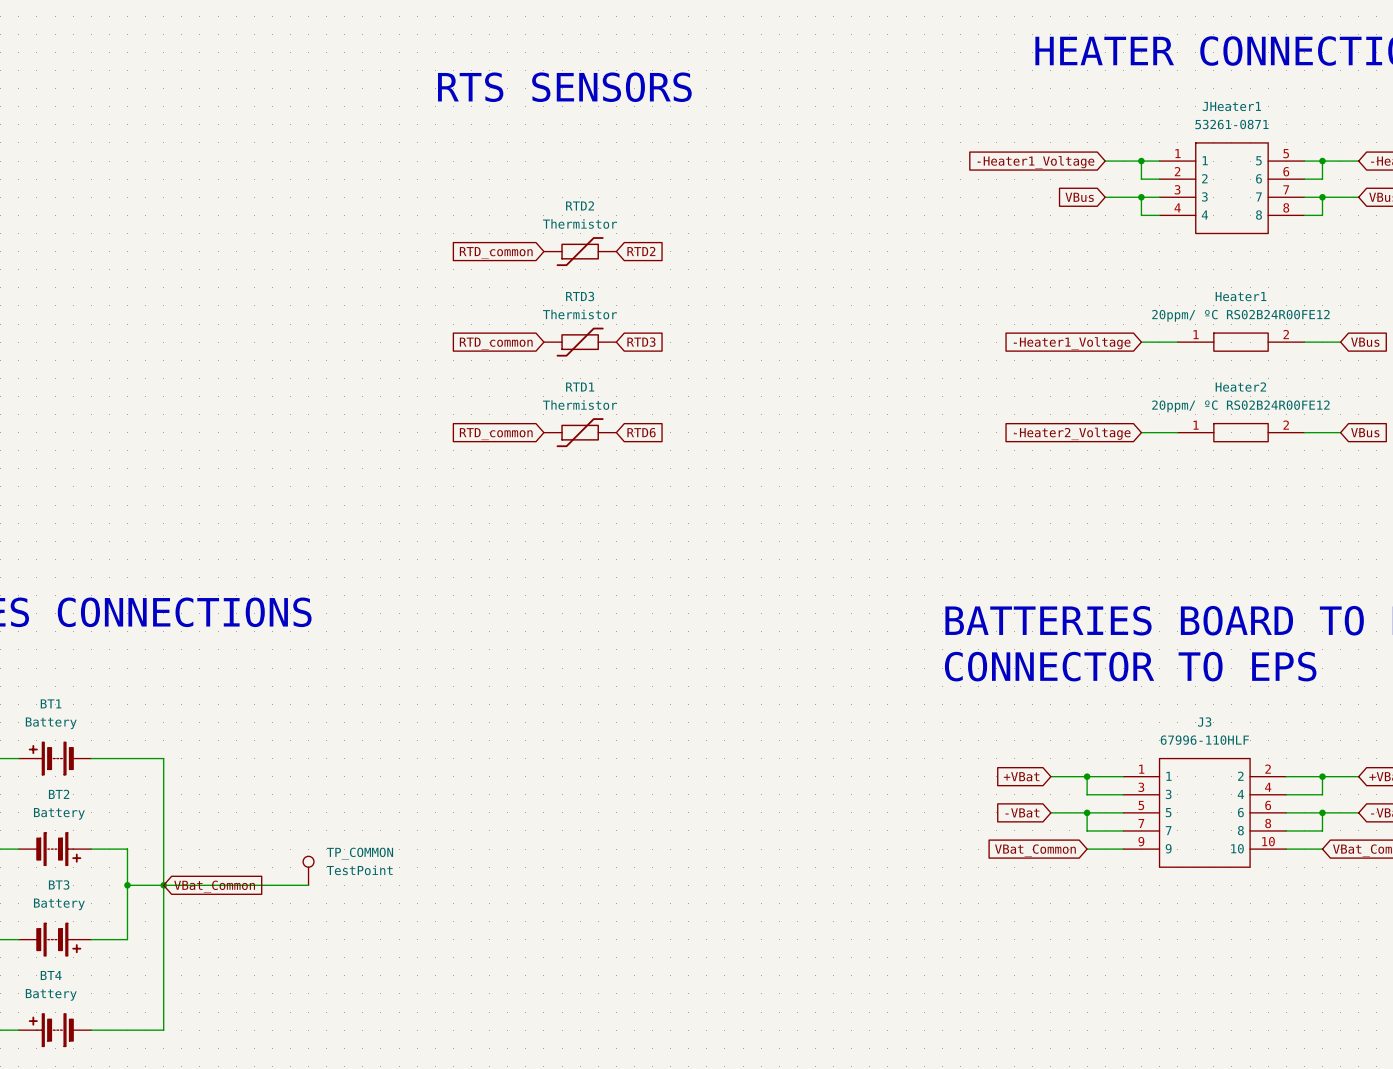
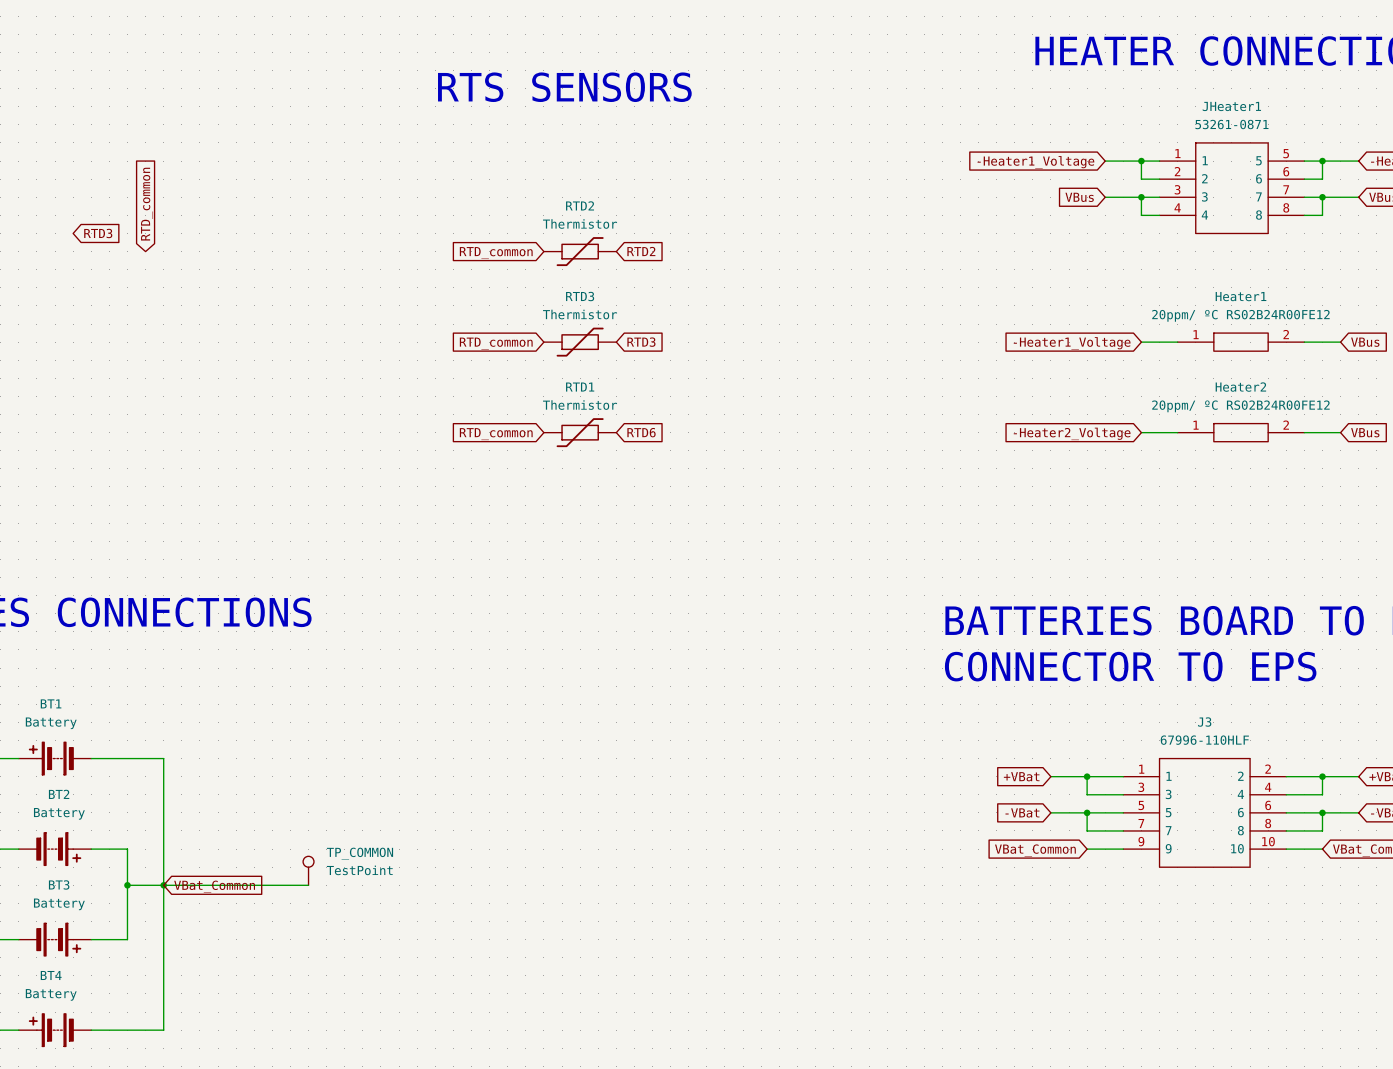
global label: none -> RTD_common (147, 204)
global label: none -> RTD3 (98, 233)

